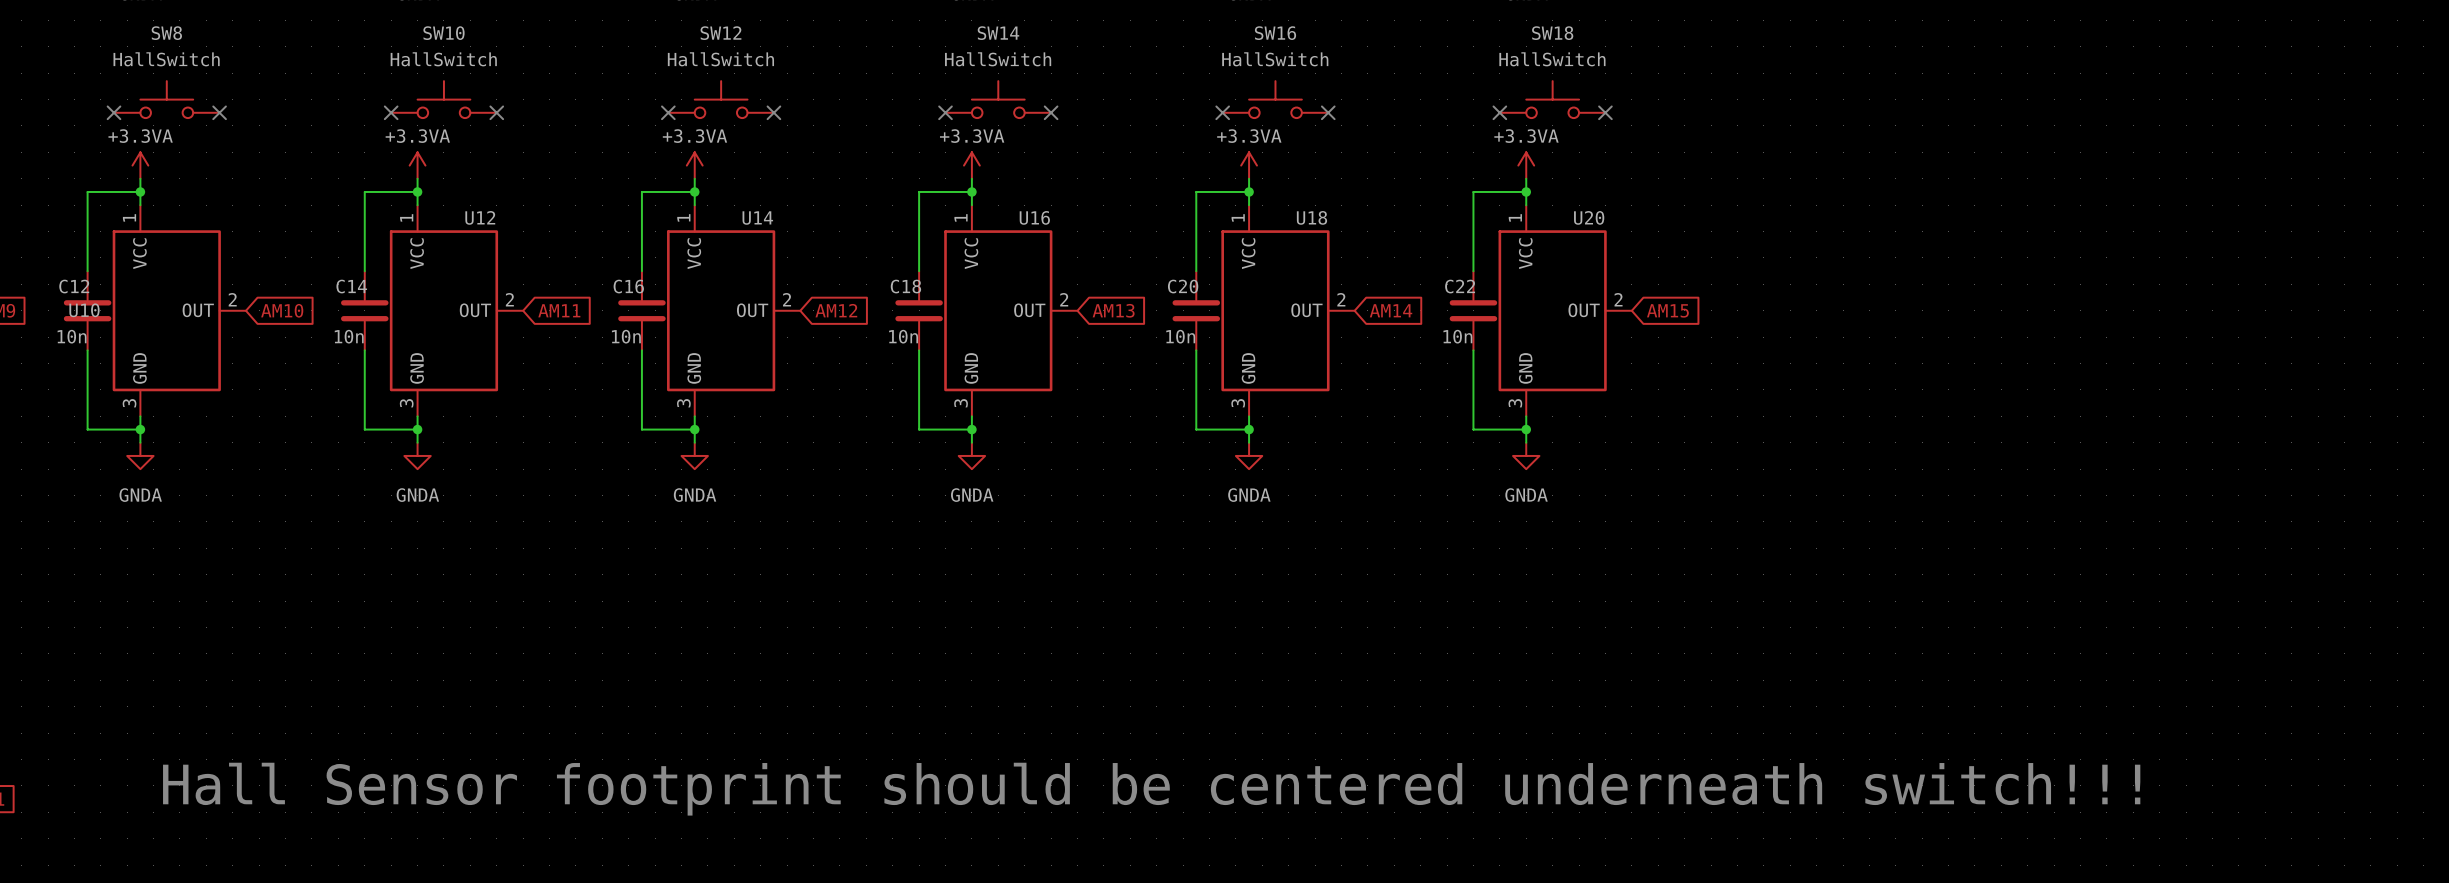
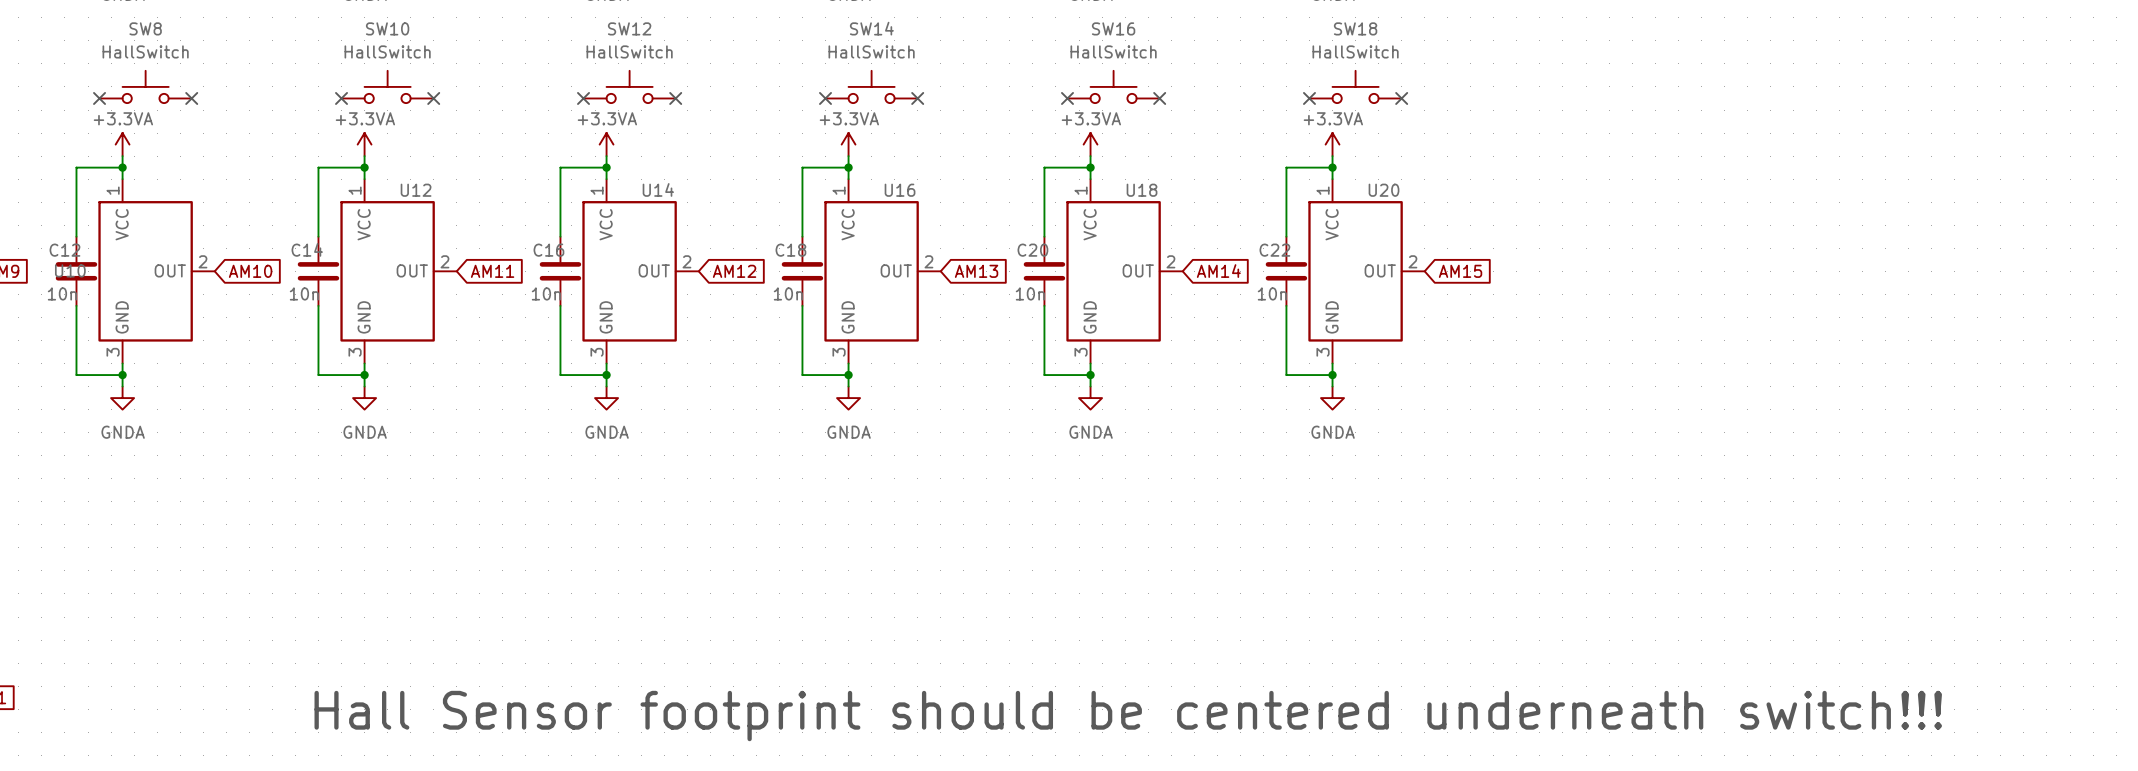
text position: Hall Sensor footprint should be centered underneath switch!!! (1151, 789) -> Hall Sensor footprint should be centered underneath switch!!! (1128, 716)

